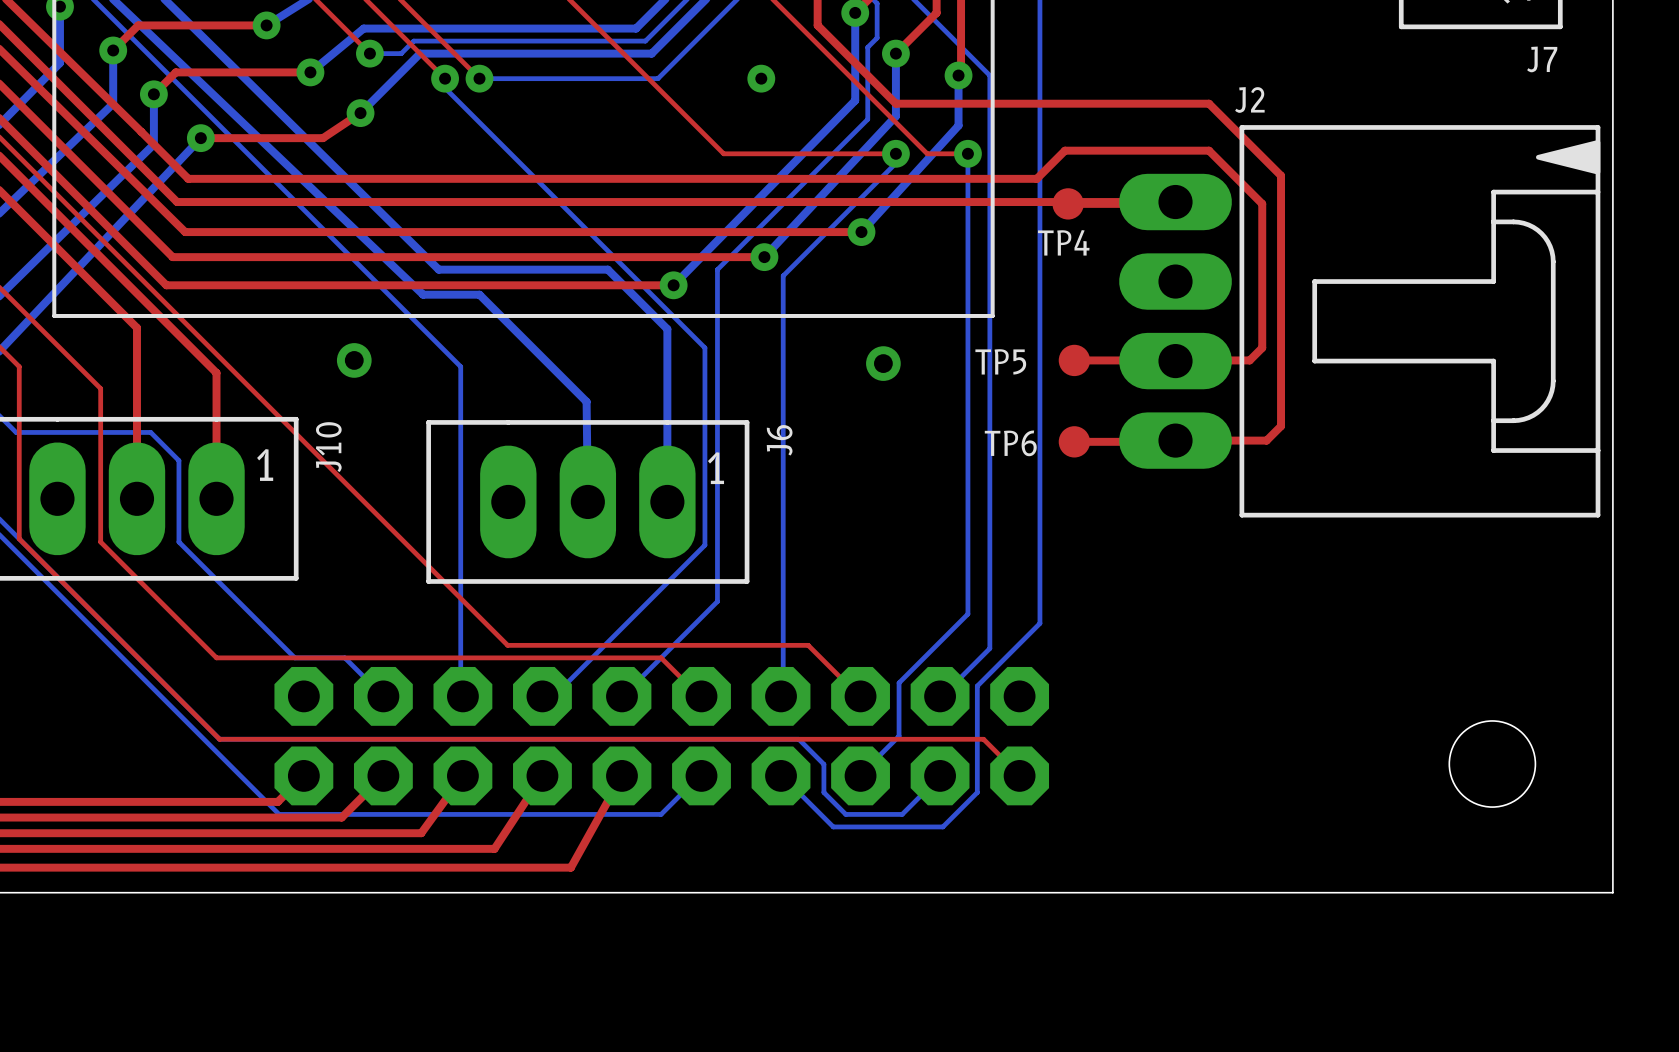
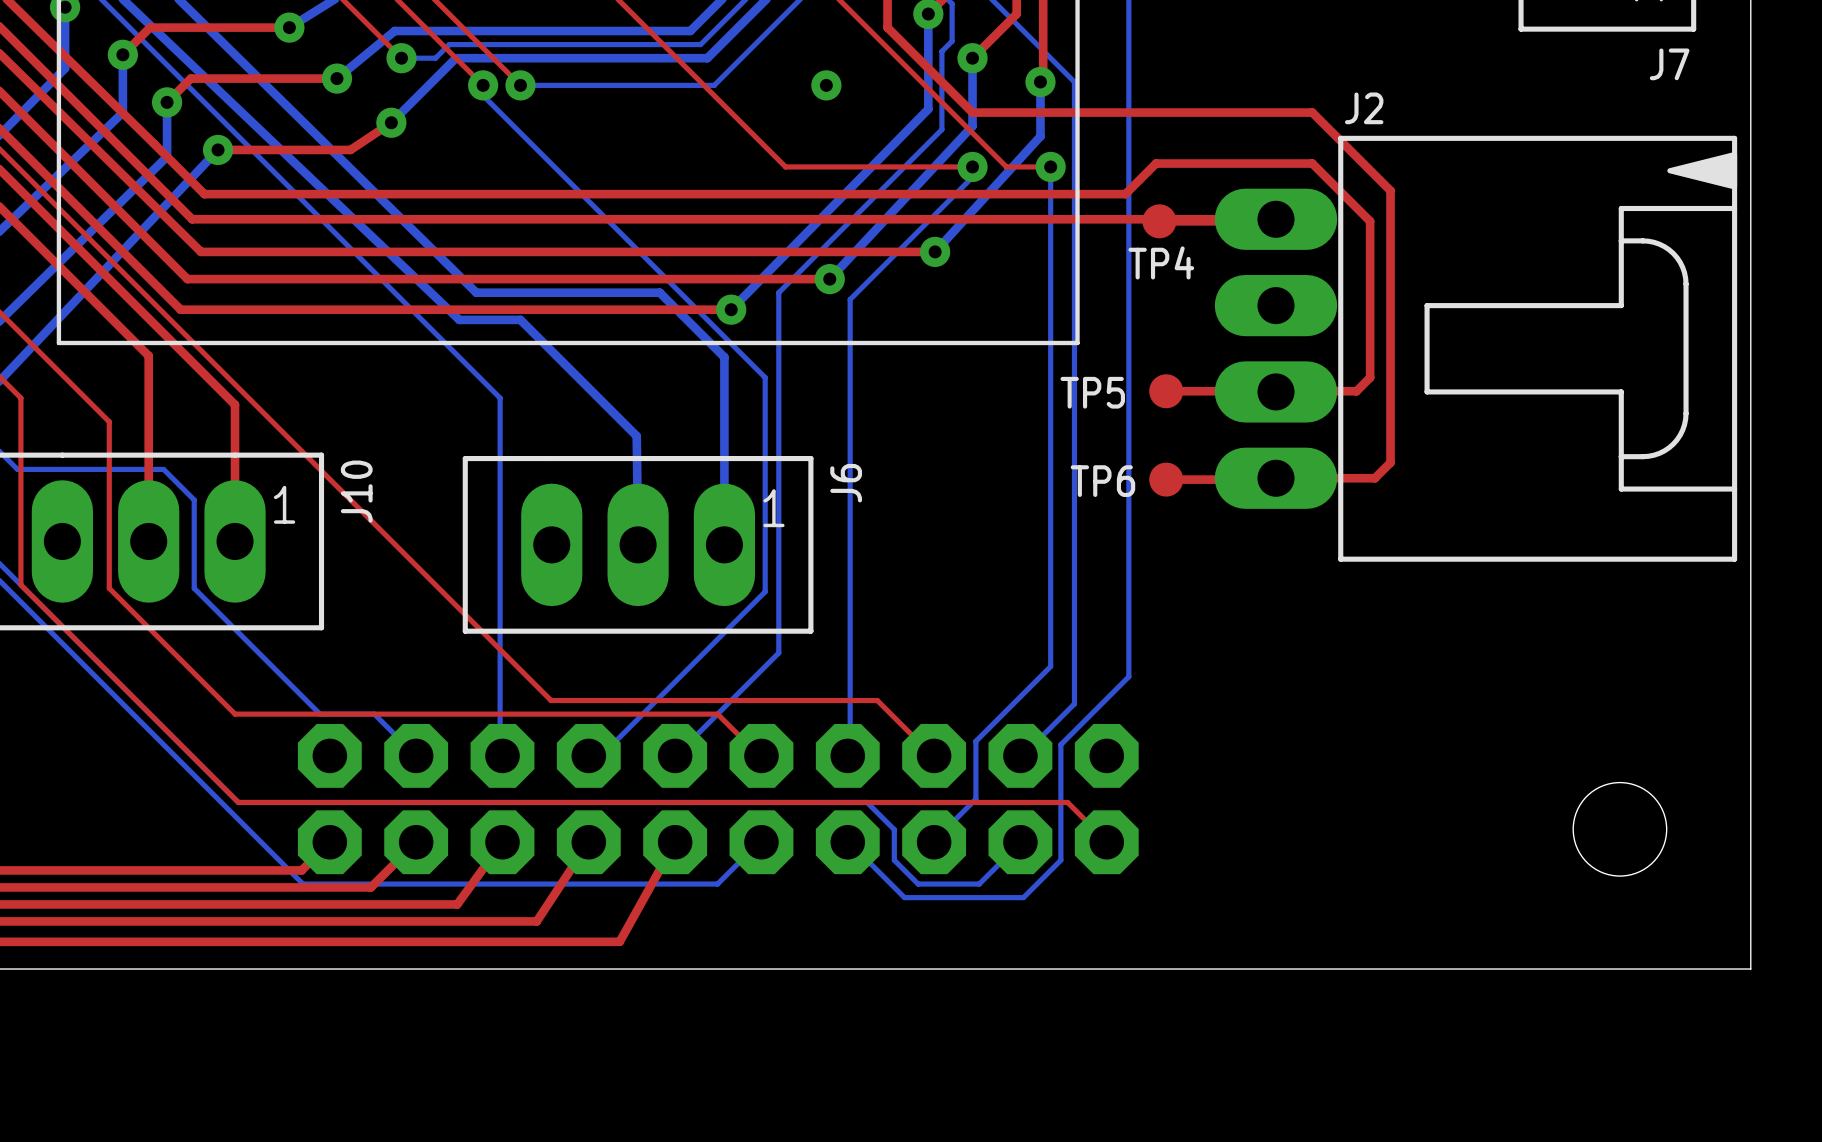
J2 footprint: [1119, 125, 1601, 518] -> [1214, 135, 1738, 562]
via: (354, 360) -> none
via: (883, 363) -> none

